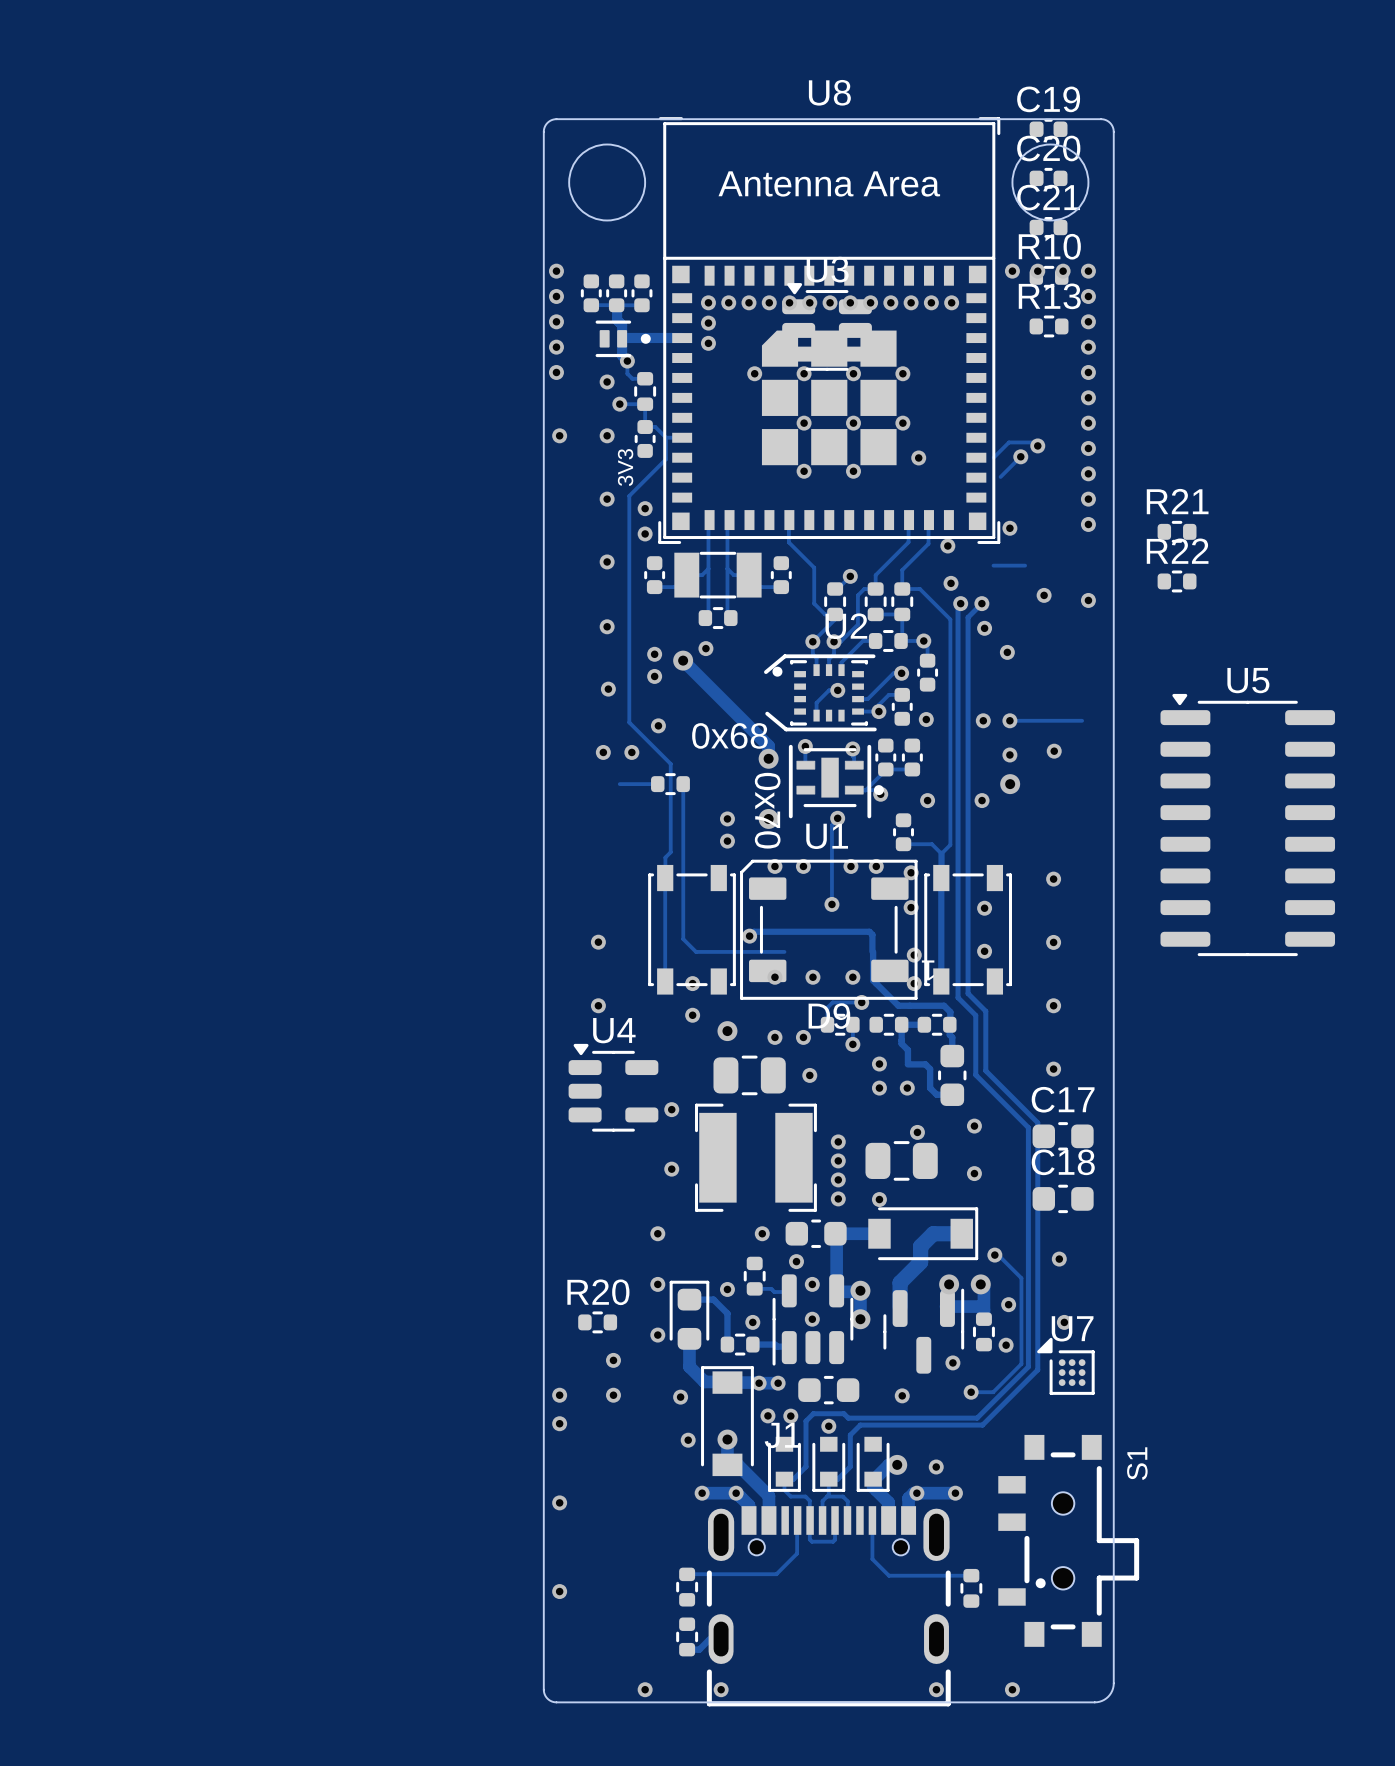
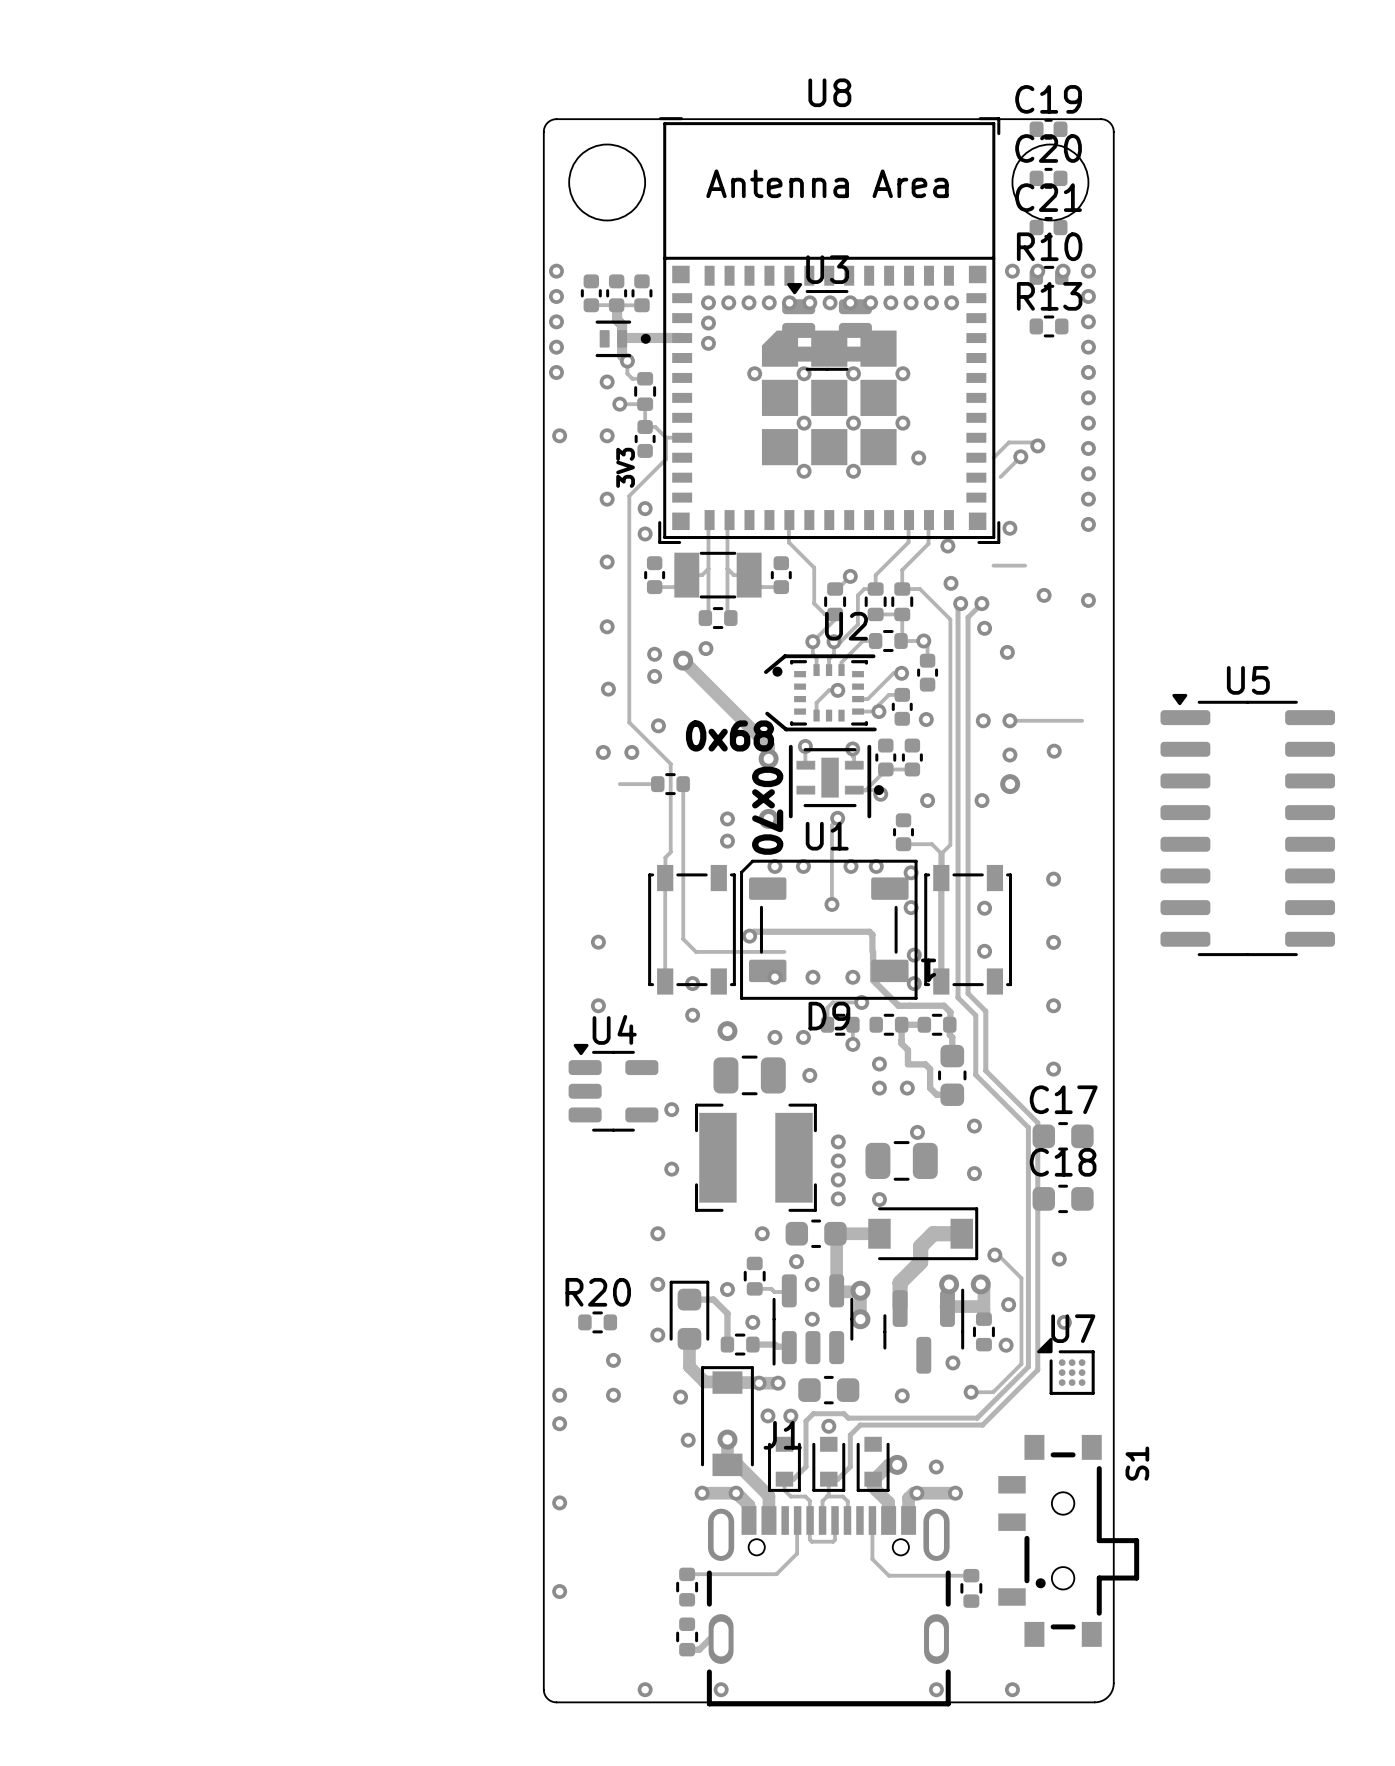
R21: (1177, 531) -> none
R22: (1177, 581) -> none

